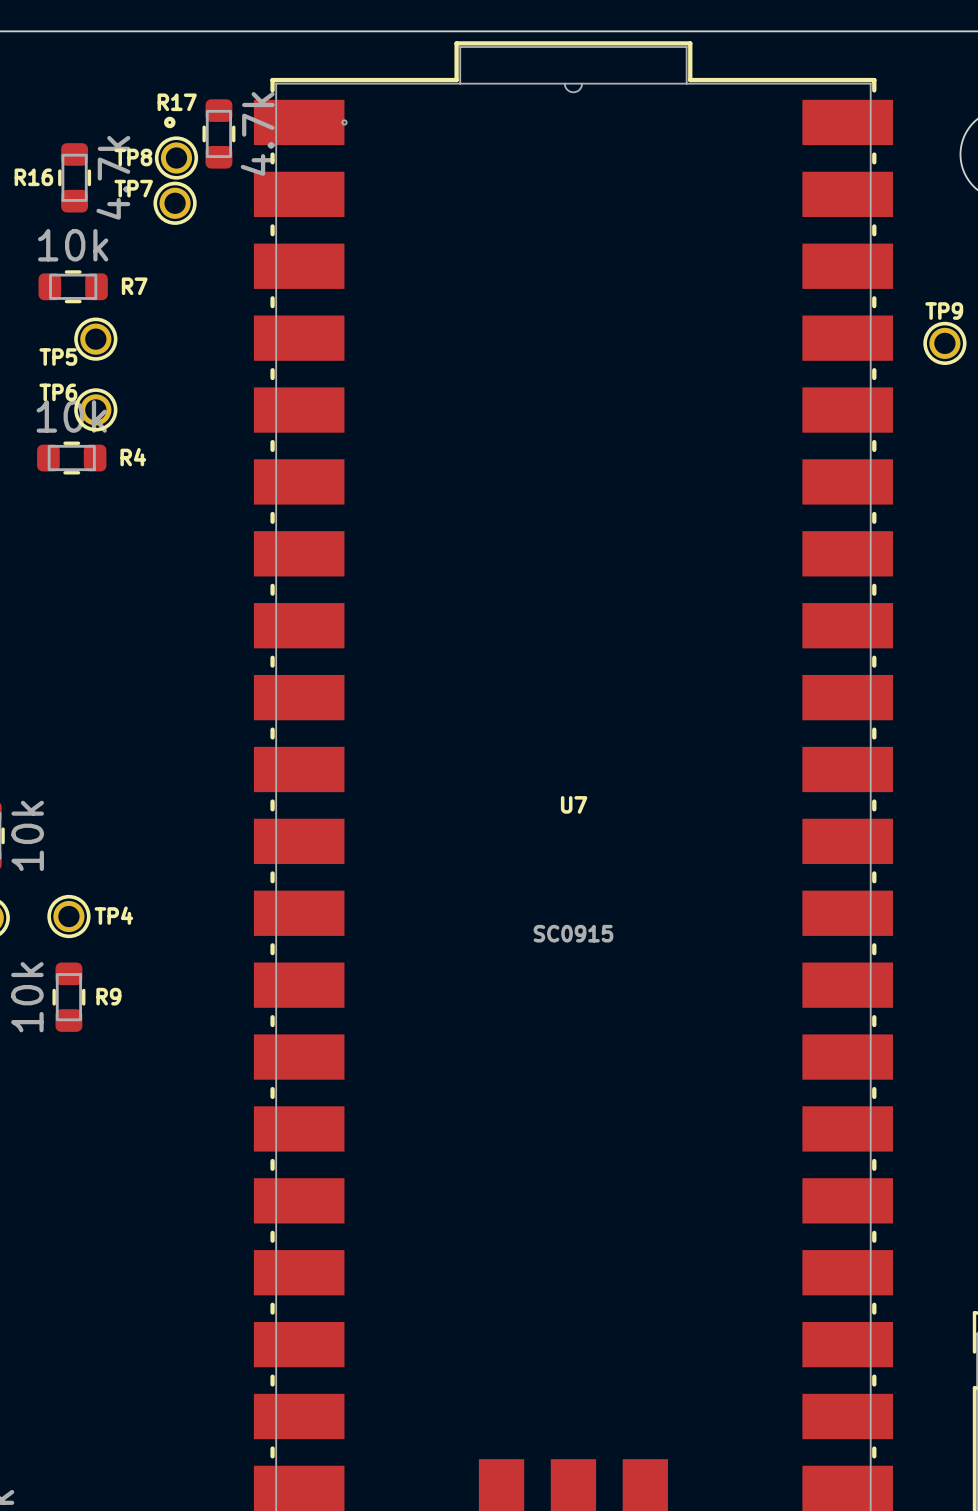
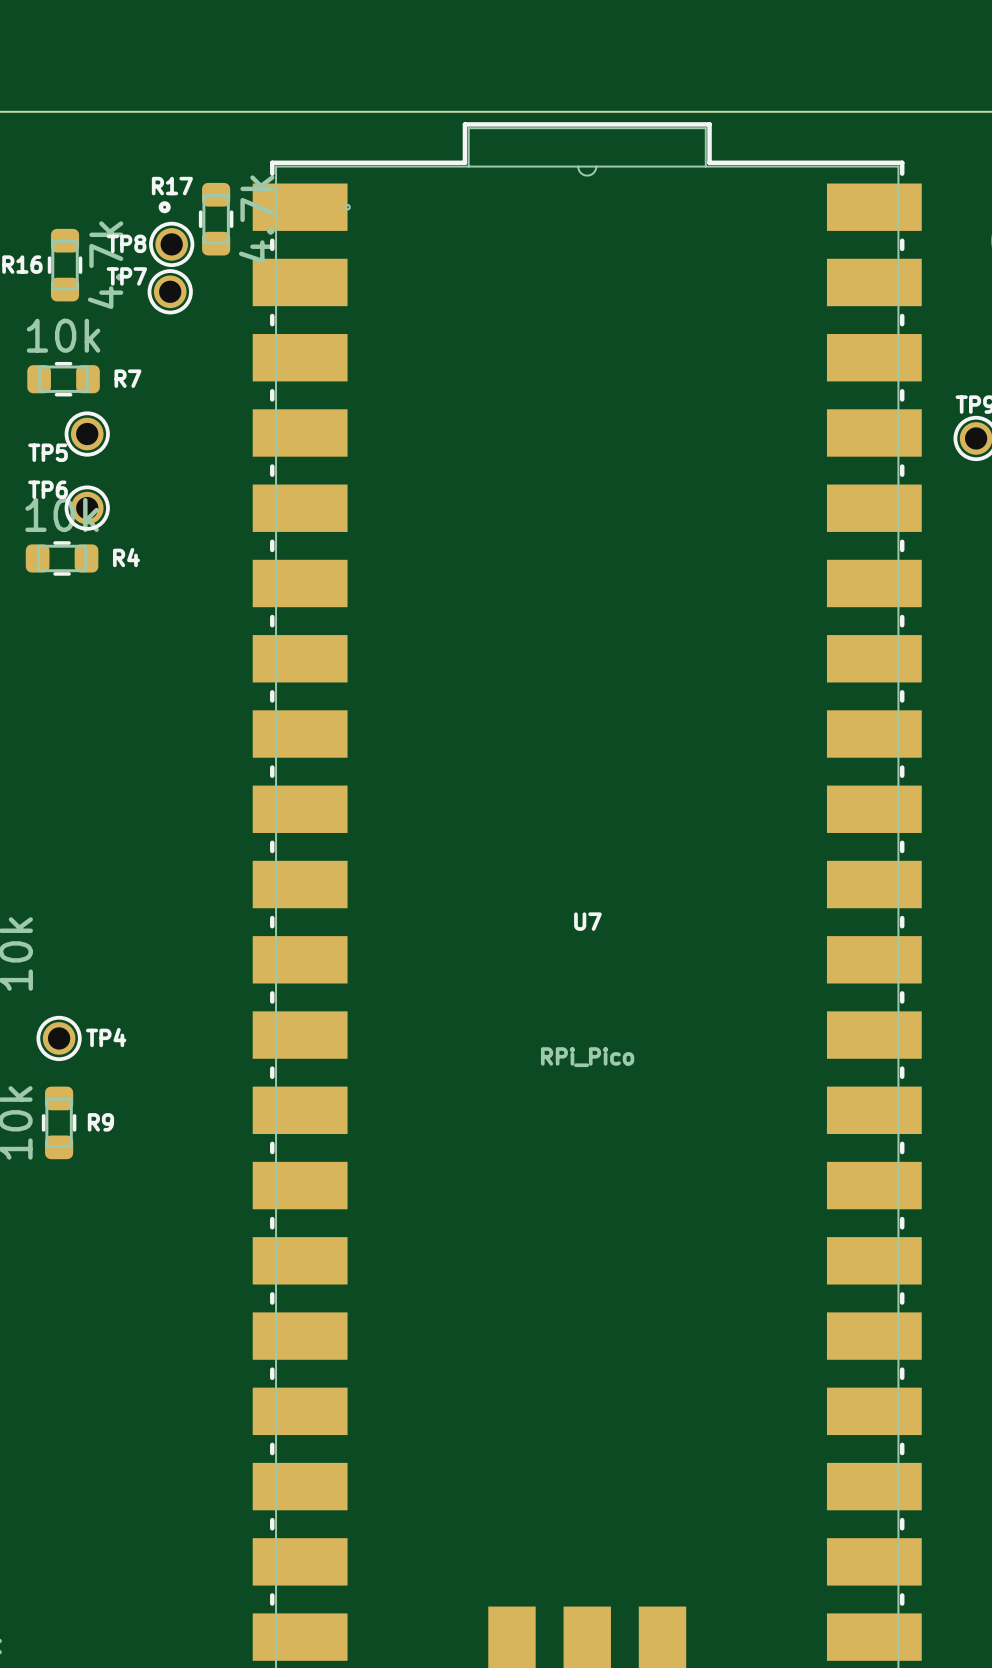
U7 value: SC0915 (573, 933) -> RPi_Pico (587, 1057)

